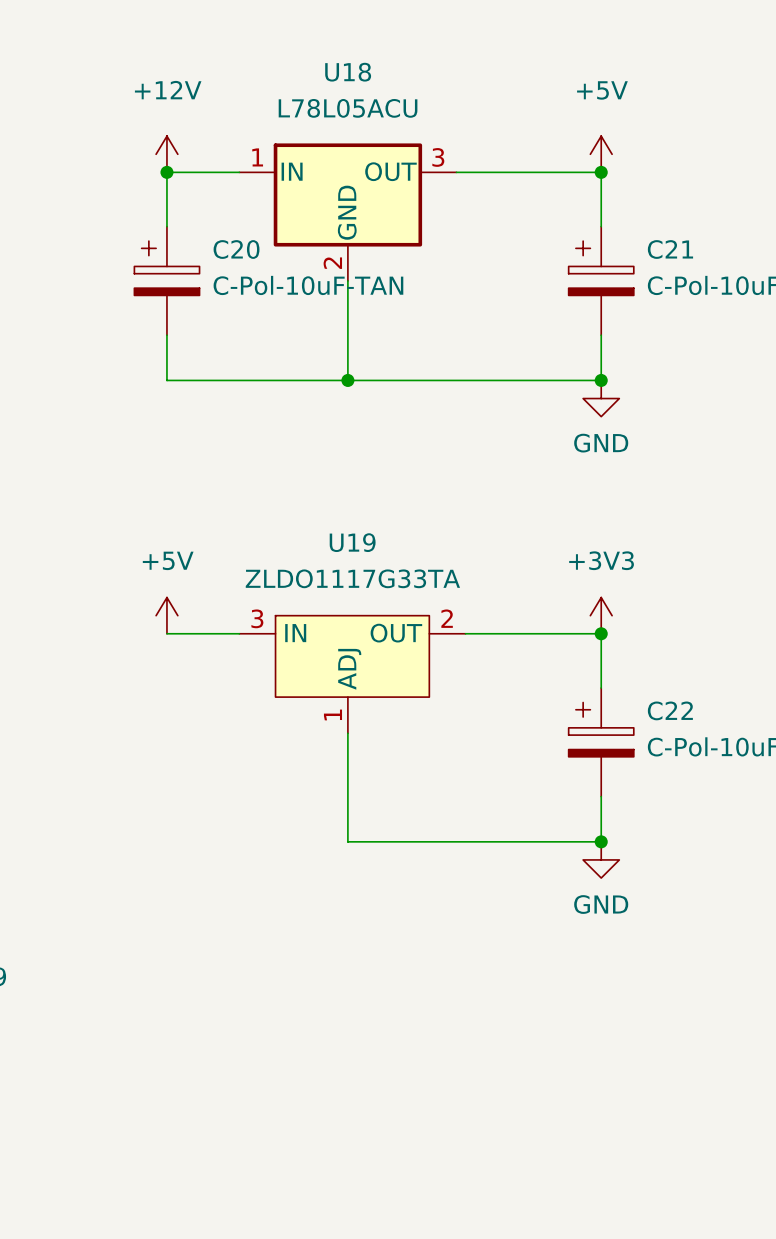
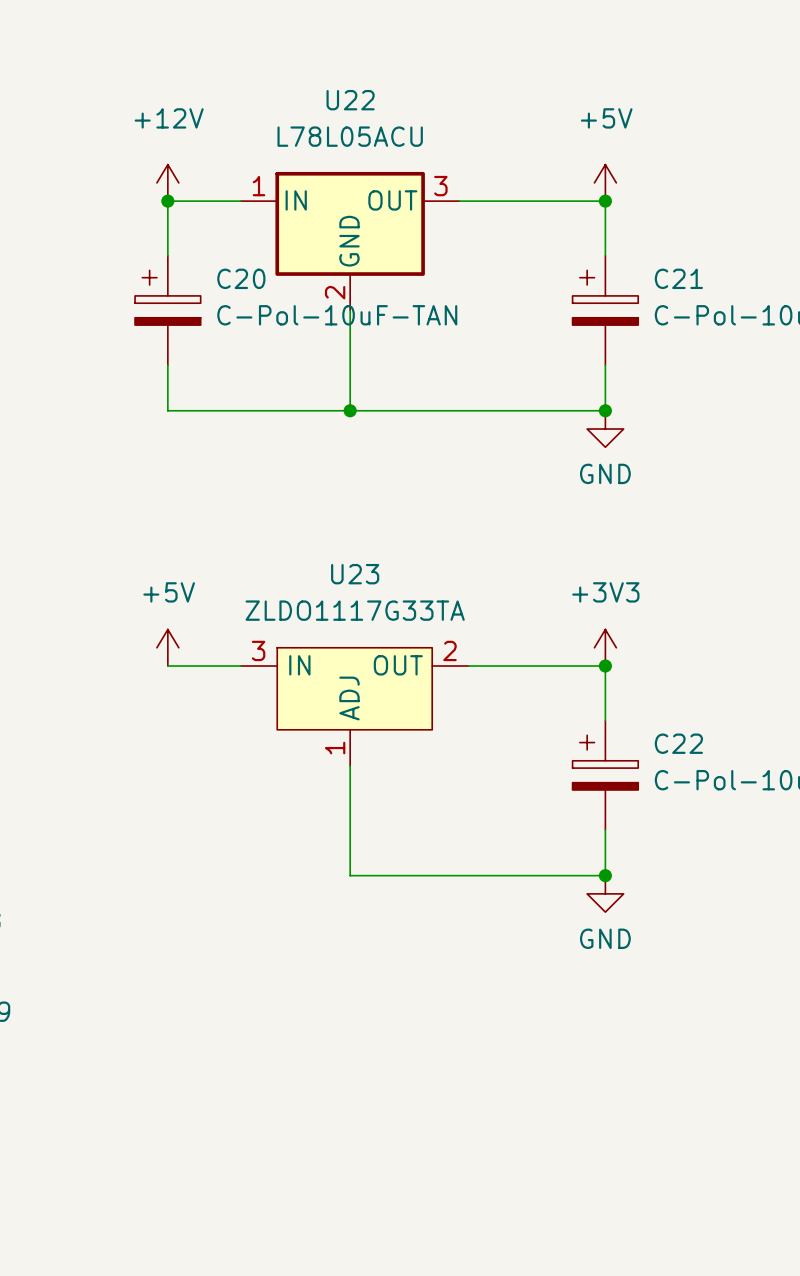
U18 name: U18 (348, 72) -> U22 (350, 100)
U19 name: U19 (352, 542) -> U23 (355, 574)

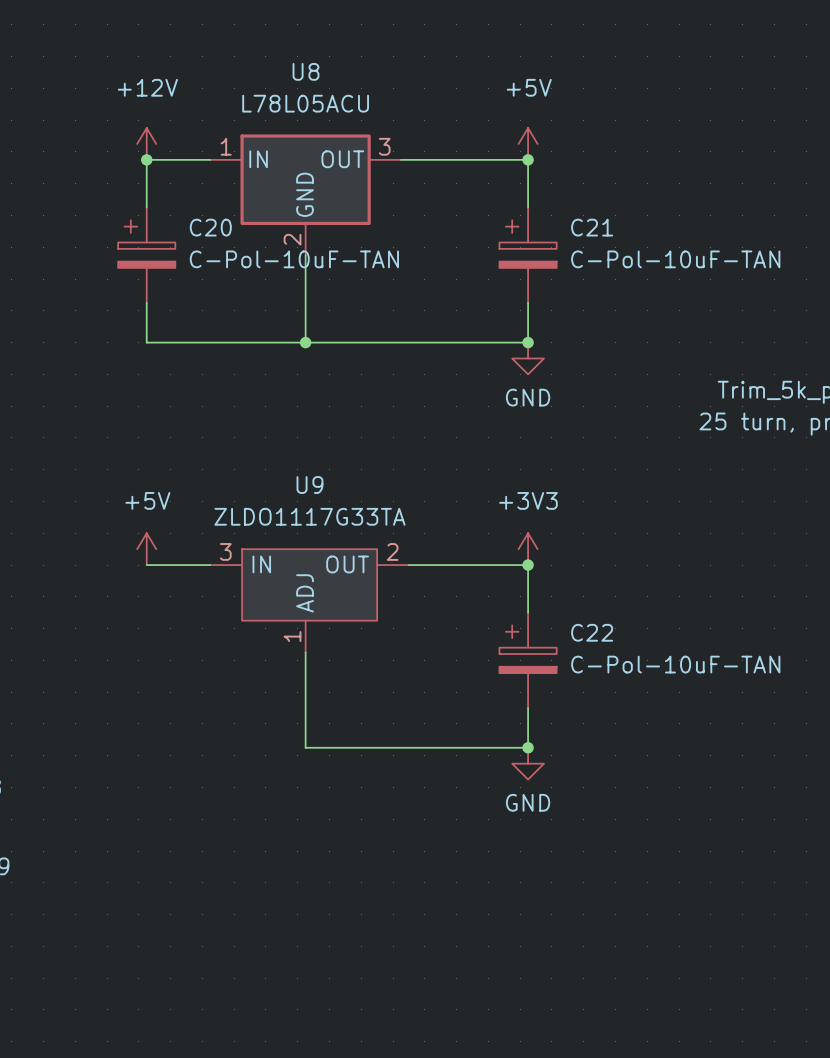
U22 name: U22 (350, 100) -> U8 (306, 71)
U23 name: U23 (355, 574) -> U9 (309, 485)

